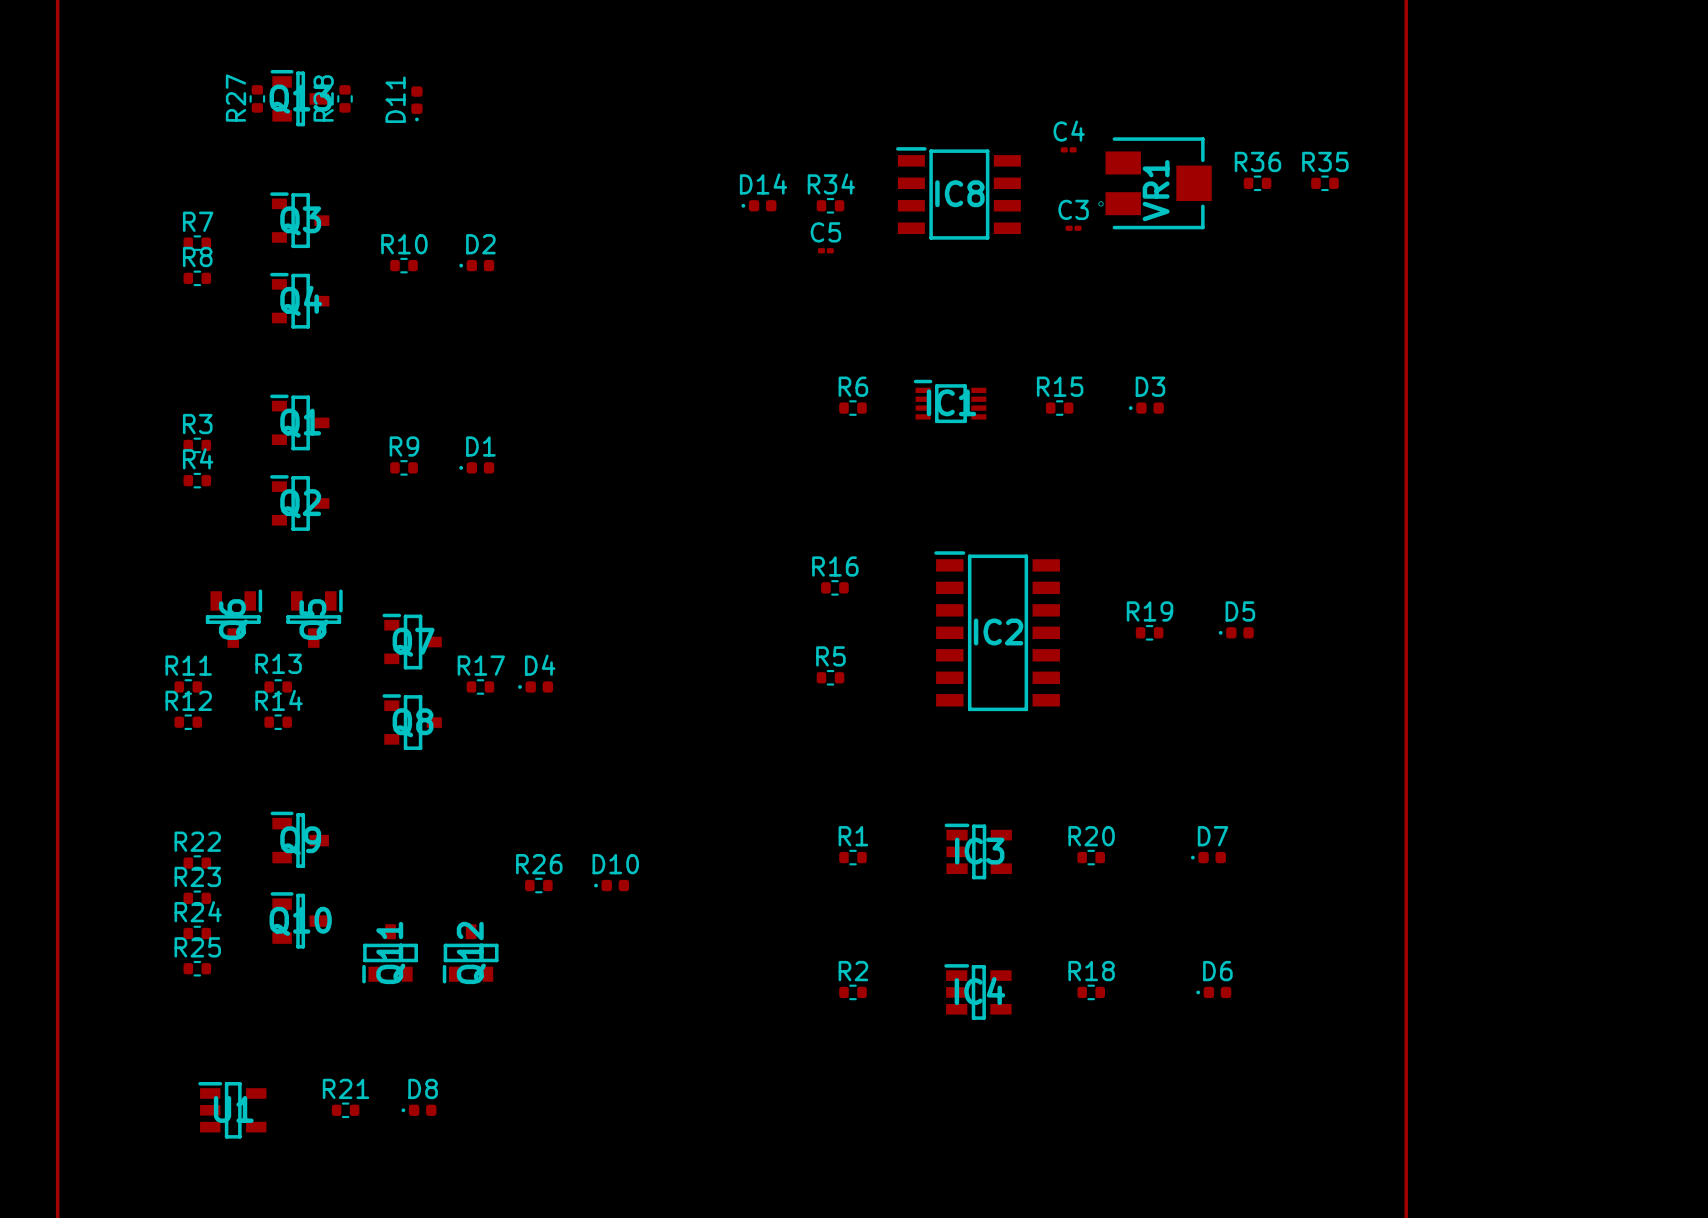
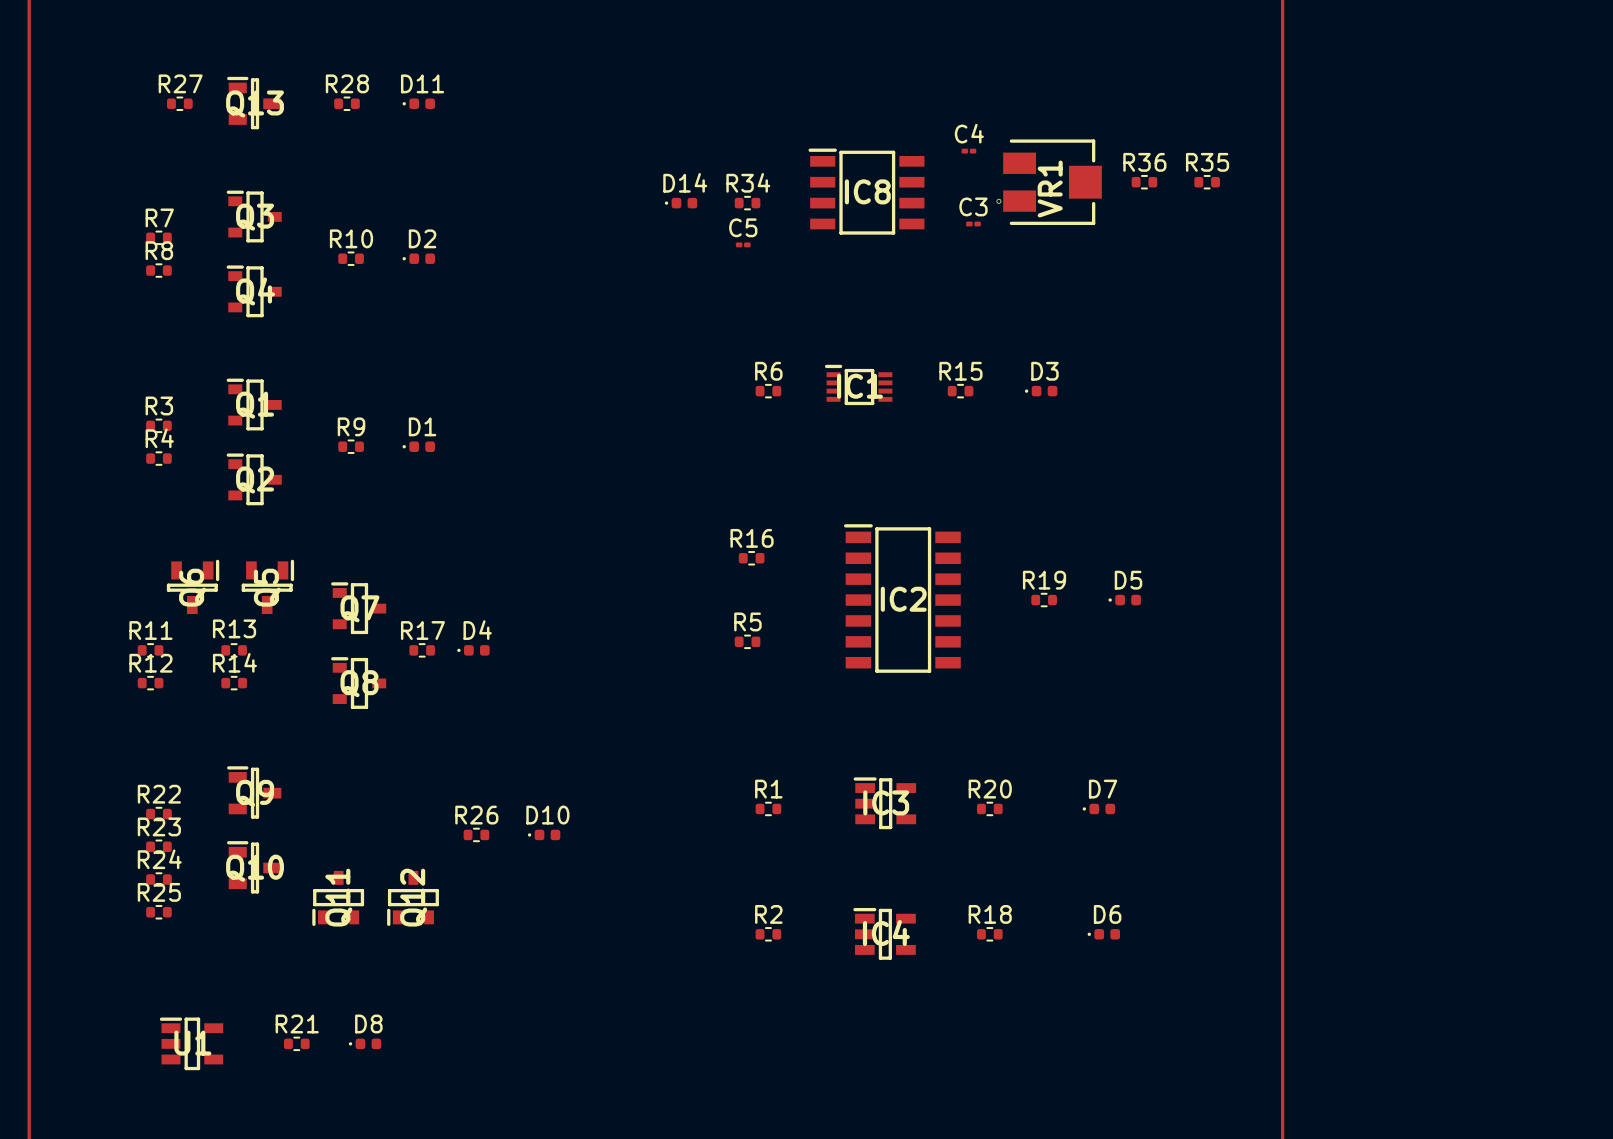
R27 rotation: 0° (257, 98) -> 90° clockwise (179, 103)
R27 position: (257, 98) -> (179, 103)
R28 rotation: 0° (345, 98) -> 90° clockwise (346, 103)
R28 position: (345, 98) -> (346, 103)
D11 rotation: 0° (416, 103) -> 90° clockwise (418, 103)
D11 position: (416, 103) -> (418, 103)

